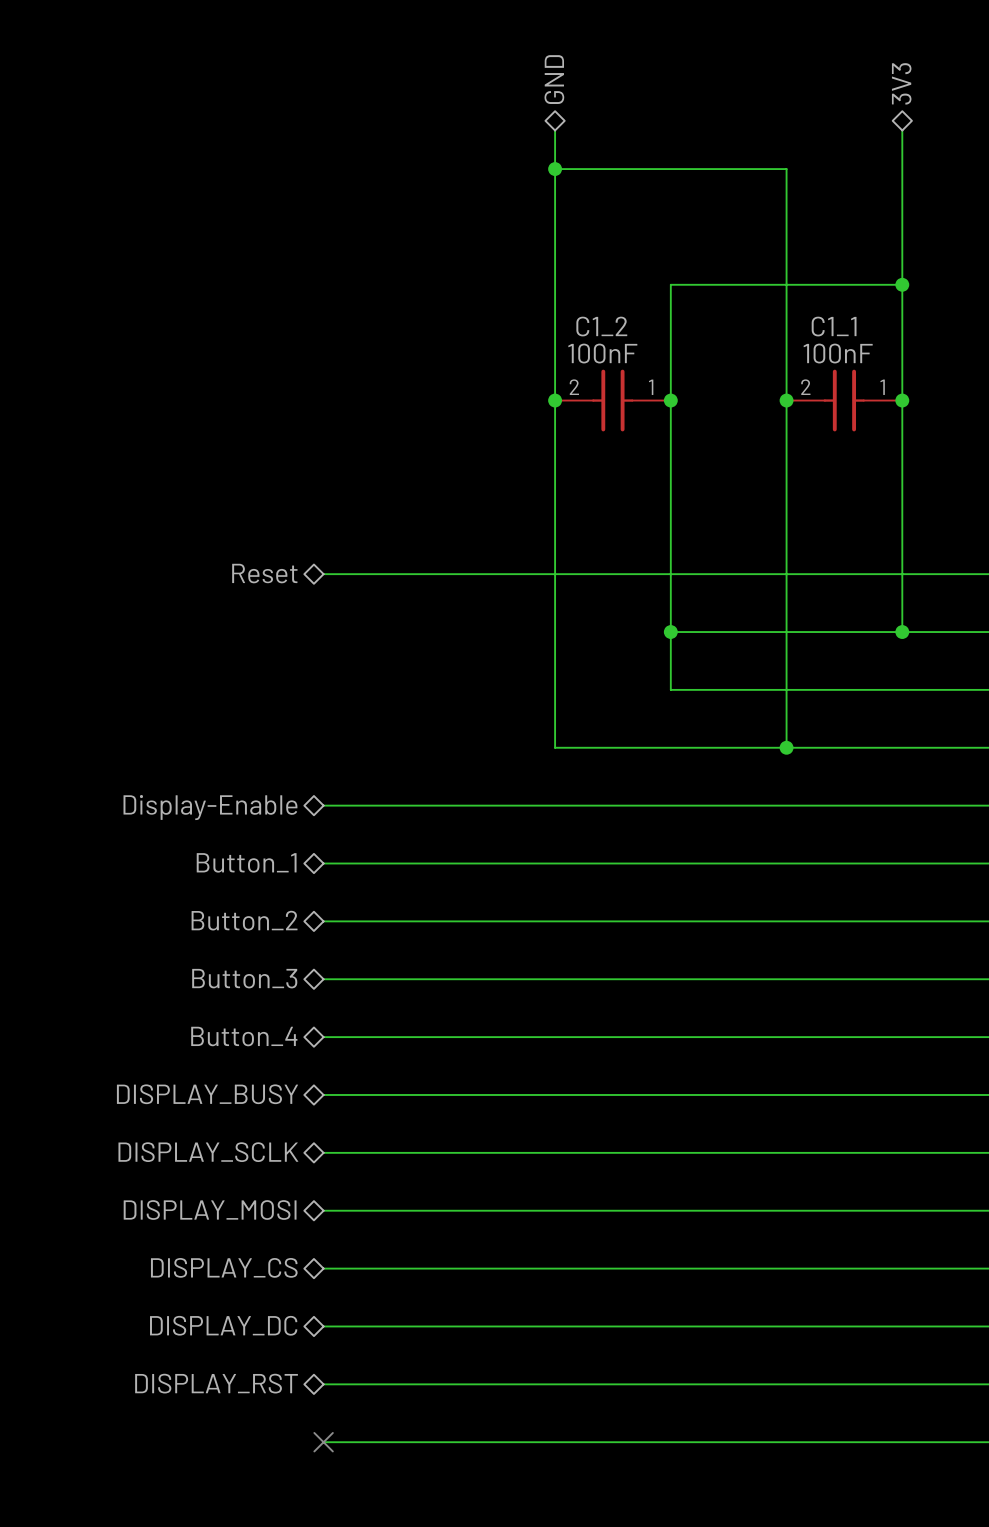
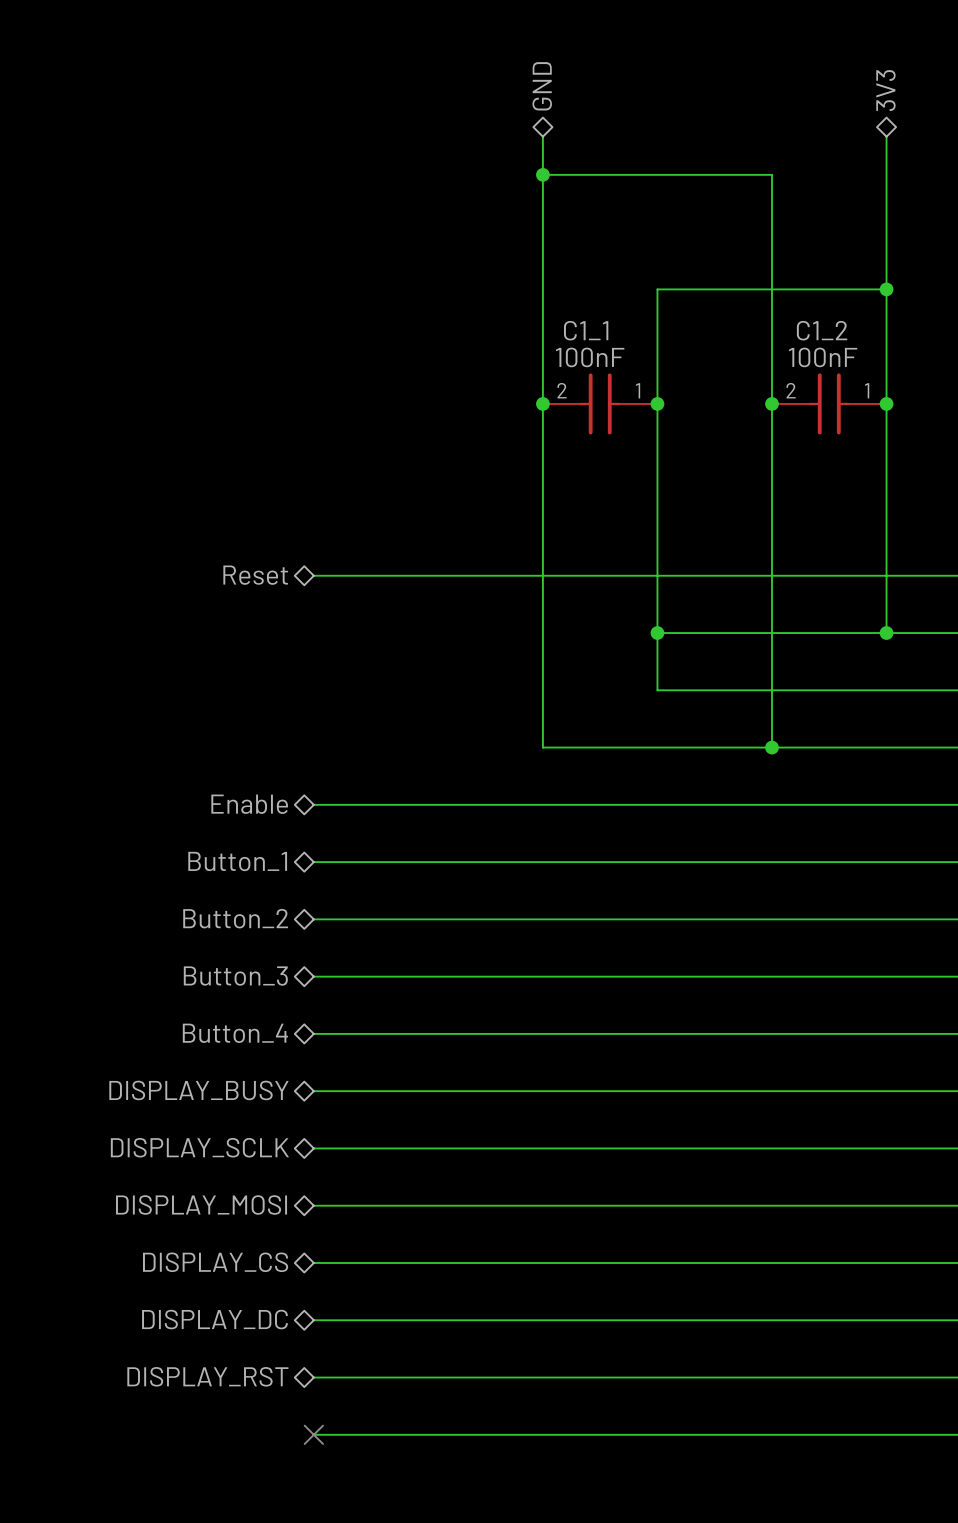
C1_2 name: C1_2 (601, 326) -> C1_1 (586, 330)
C1_1 name: C1_1 (834, 326) -> C1_2 (822, 330)
hierarchical label: Display-Enable (210, 807) -> Enable (249, 804)

